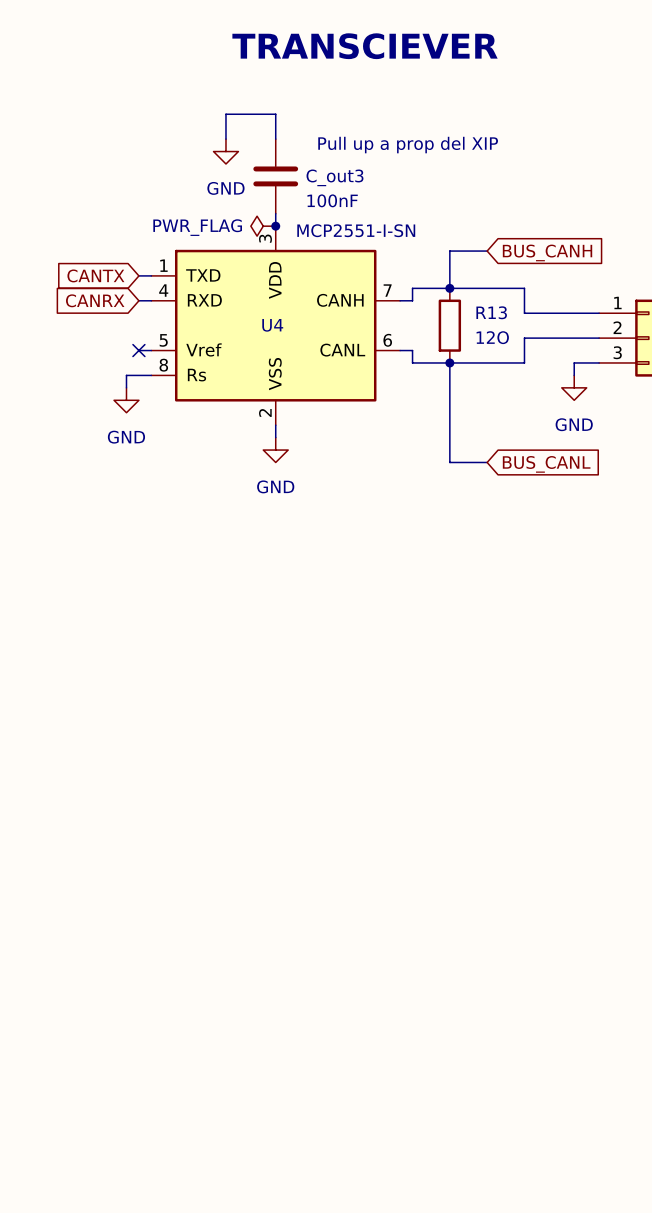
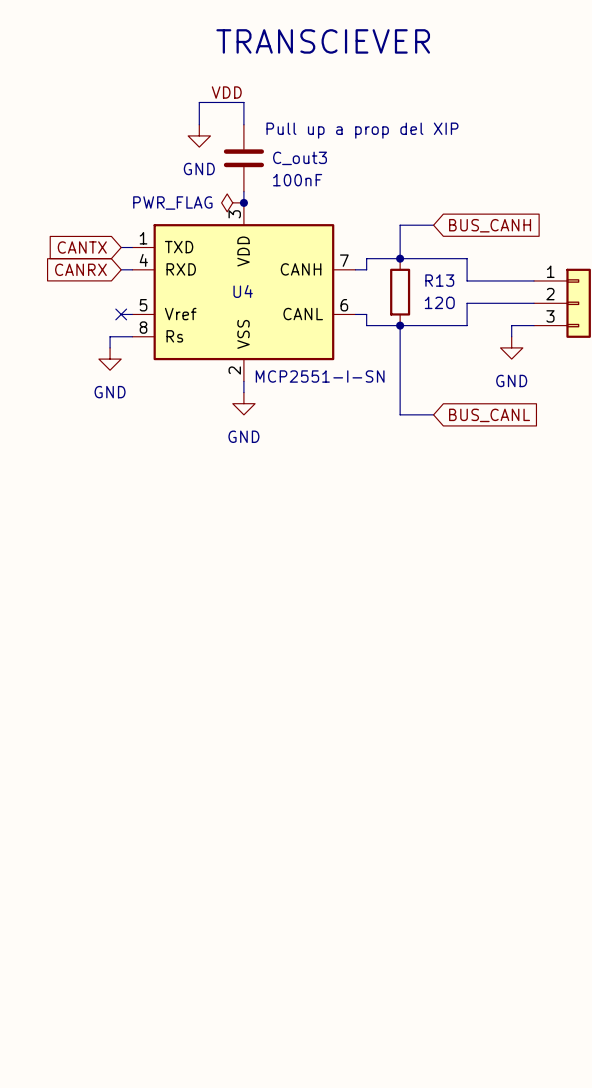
label: none -> VDD (226, 92)
U4 value position: MCP2551-I-SN (356, 230) -> MCP2551-I-SN (320, 376)

